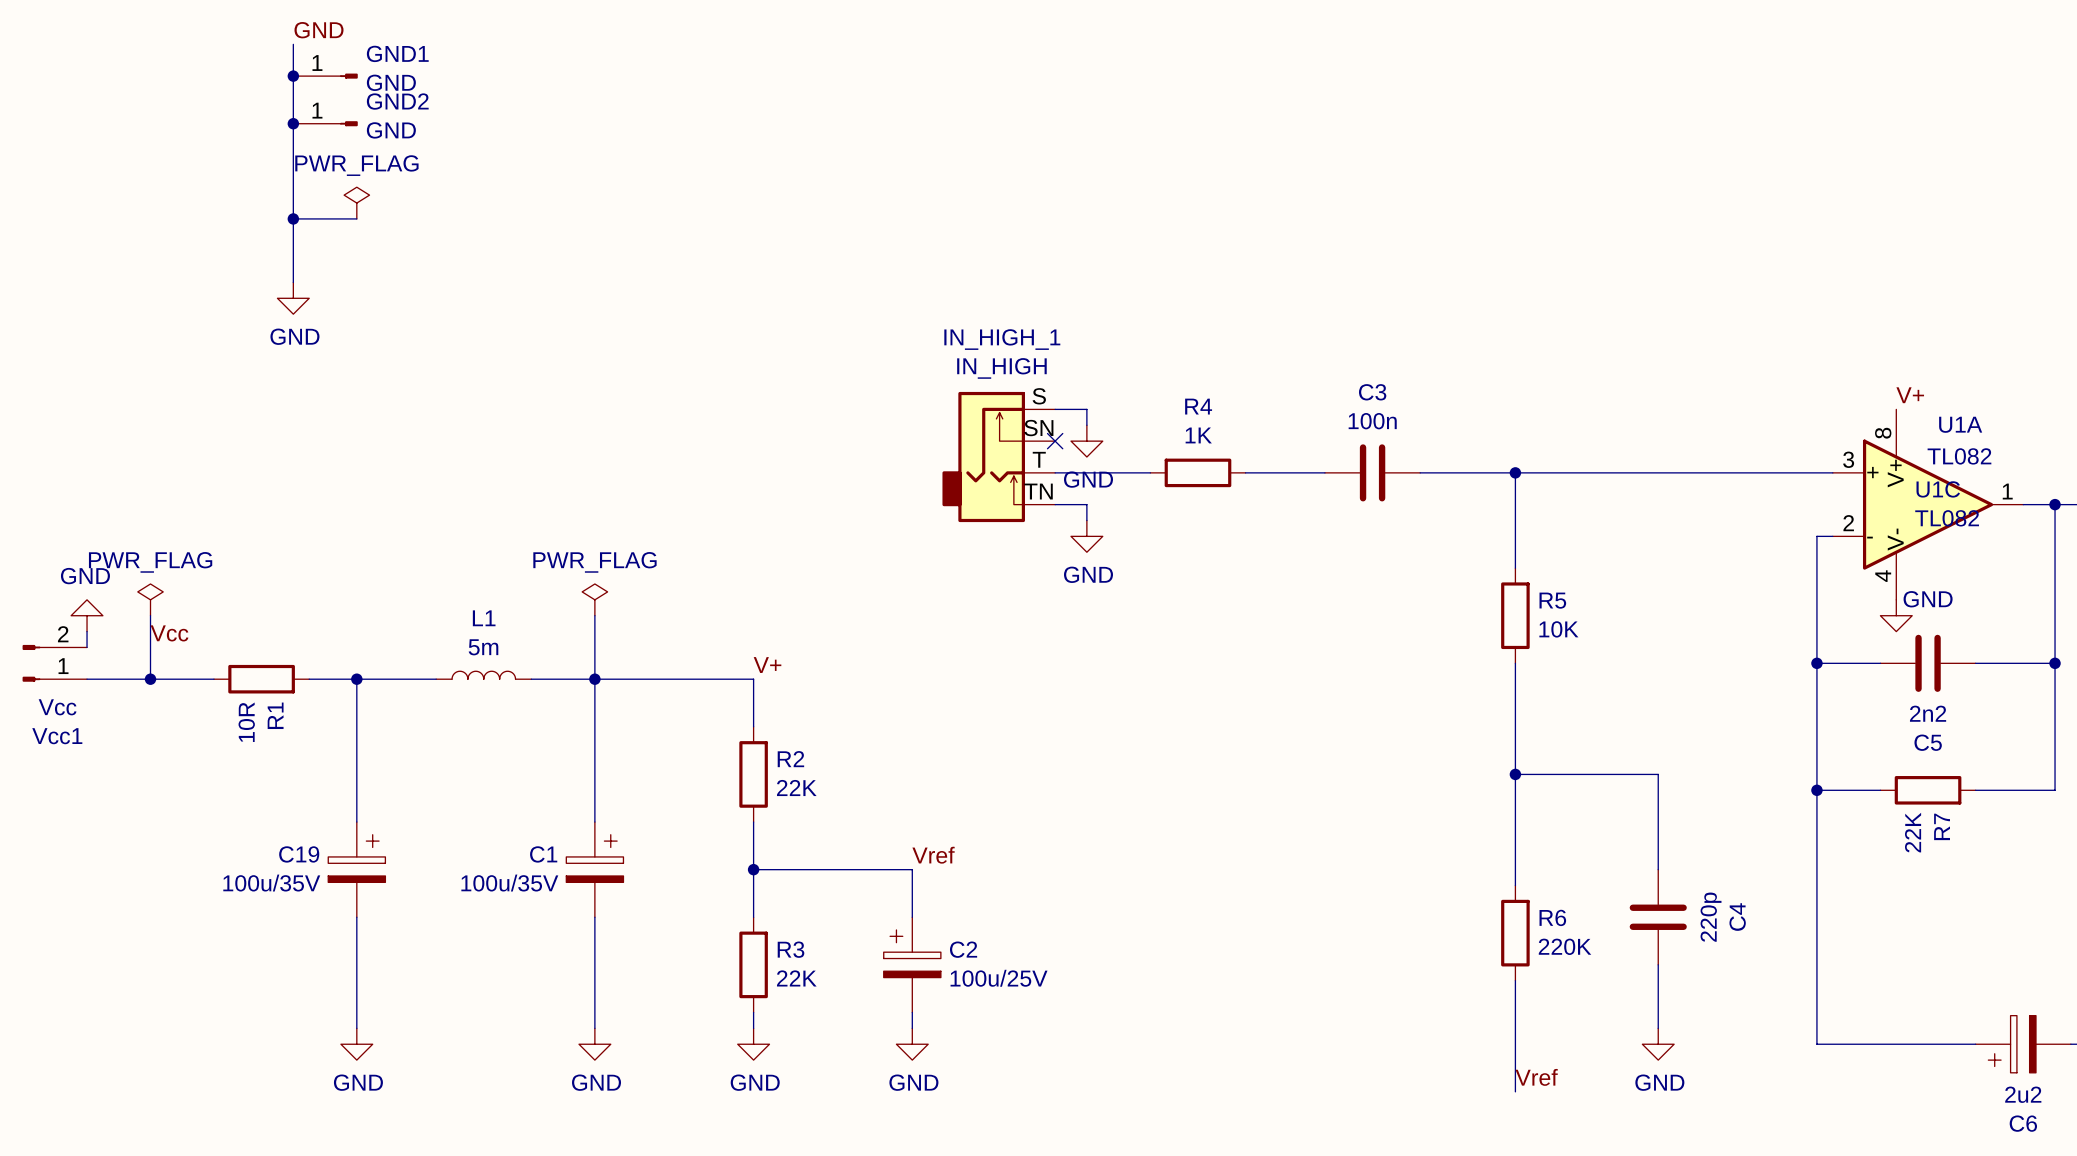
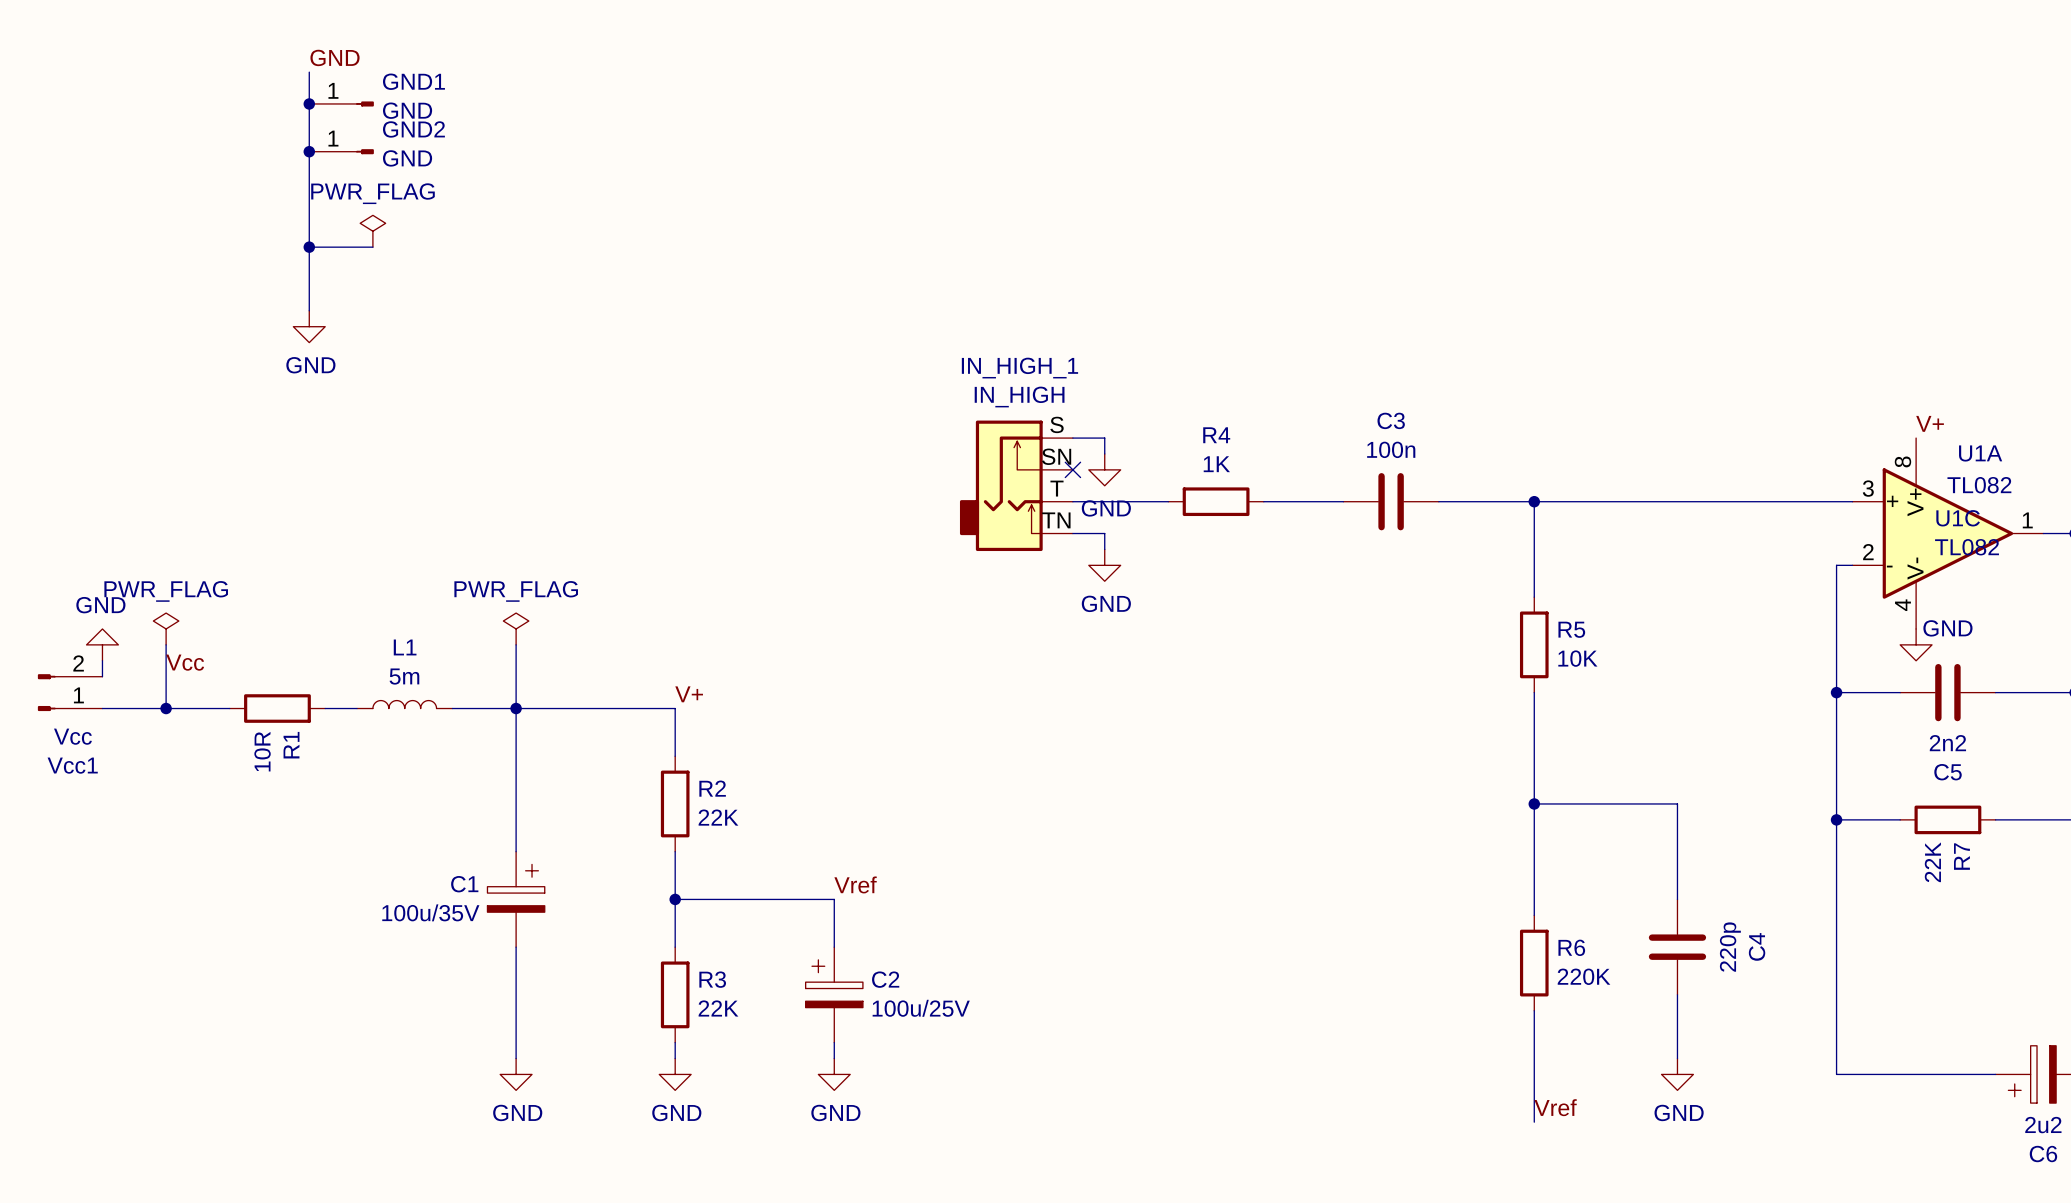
power symbol position: PWR_FLAG (594, 599) -> PWR_FLAG (516, 628)
wire: (594, 615) (594, 822) -> (516, 644) (516, 851)
label position: V+ (767, 665) -> V+ (689, 694)
L1 position: (483, 675) -> (404, 704)
wire: (340, 679) (436, 679) -> (547, 708) (452, 708)
wire: (356, 679) (356, 822) -> none
junction: (356, 679) -> none
junction: none -> (516, 708)
junction: (594, 679) -> none
wire: (658, 679) (753, 679) (753, 726) -> (675, 708) (675, 756)
R2 position: (753, 774) -> (675, 803)
wire: (753, 822) (753, 917) -> (675, 851) (675, 947)
label position: Vref (933, 855) -> Vref (855, 884)
C19: 100u/35V (356, 869) -> none
C1 position: (594, 869) -> (516, 899)
wire: none -> (675, 899) (770, 899)
junction: none -> (675, 899)
junction: (753, 869) -> none
wire: (817, 869) (912, 869) (912, 917) -> (834, 899) (834, 947)
wire: (356, 917) (356, 1028) -> none
wire: (594, 917) (594, 1028) -> (516, 947) (516, 1058)
R3 position: (753, 964) -> (675, 994)
C2 position: (912, 964) -> (834, 994)
wire: (753, 1012) (753, 1028) -> (675, 1042) (675, 1058)
wire: (912, 1012) (912, 1028) -> (834, 1042) (834, 1058)
power symbol: GND (356, 1044) -> none
power symbol: none -> GND (516, 1074)
power symbol: GND (594, 1044) -> none
power symbol: none -> GND (675, 1074)
power symbol: GND (753, 1044) -> none
power symbol: none -> GND (834, 1074)
power symbol: GND (912, 1044) -> none

